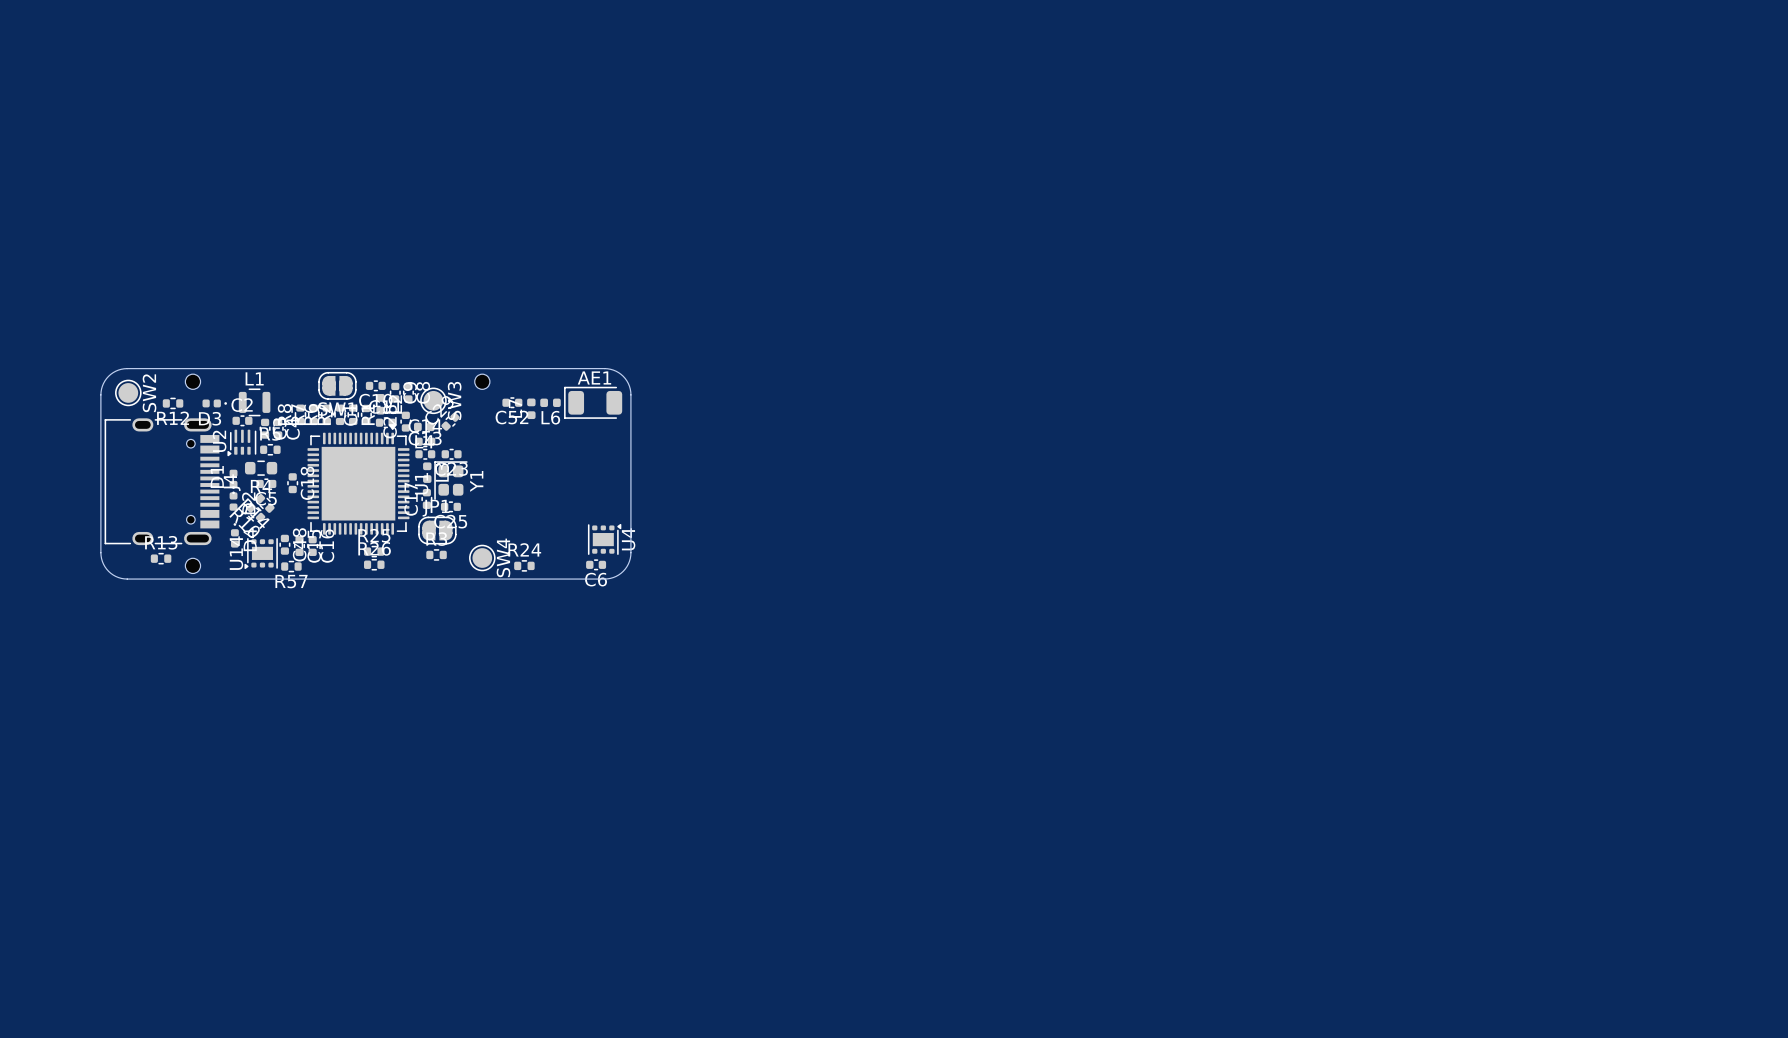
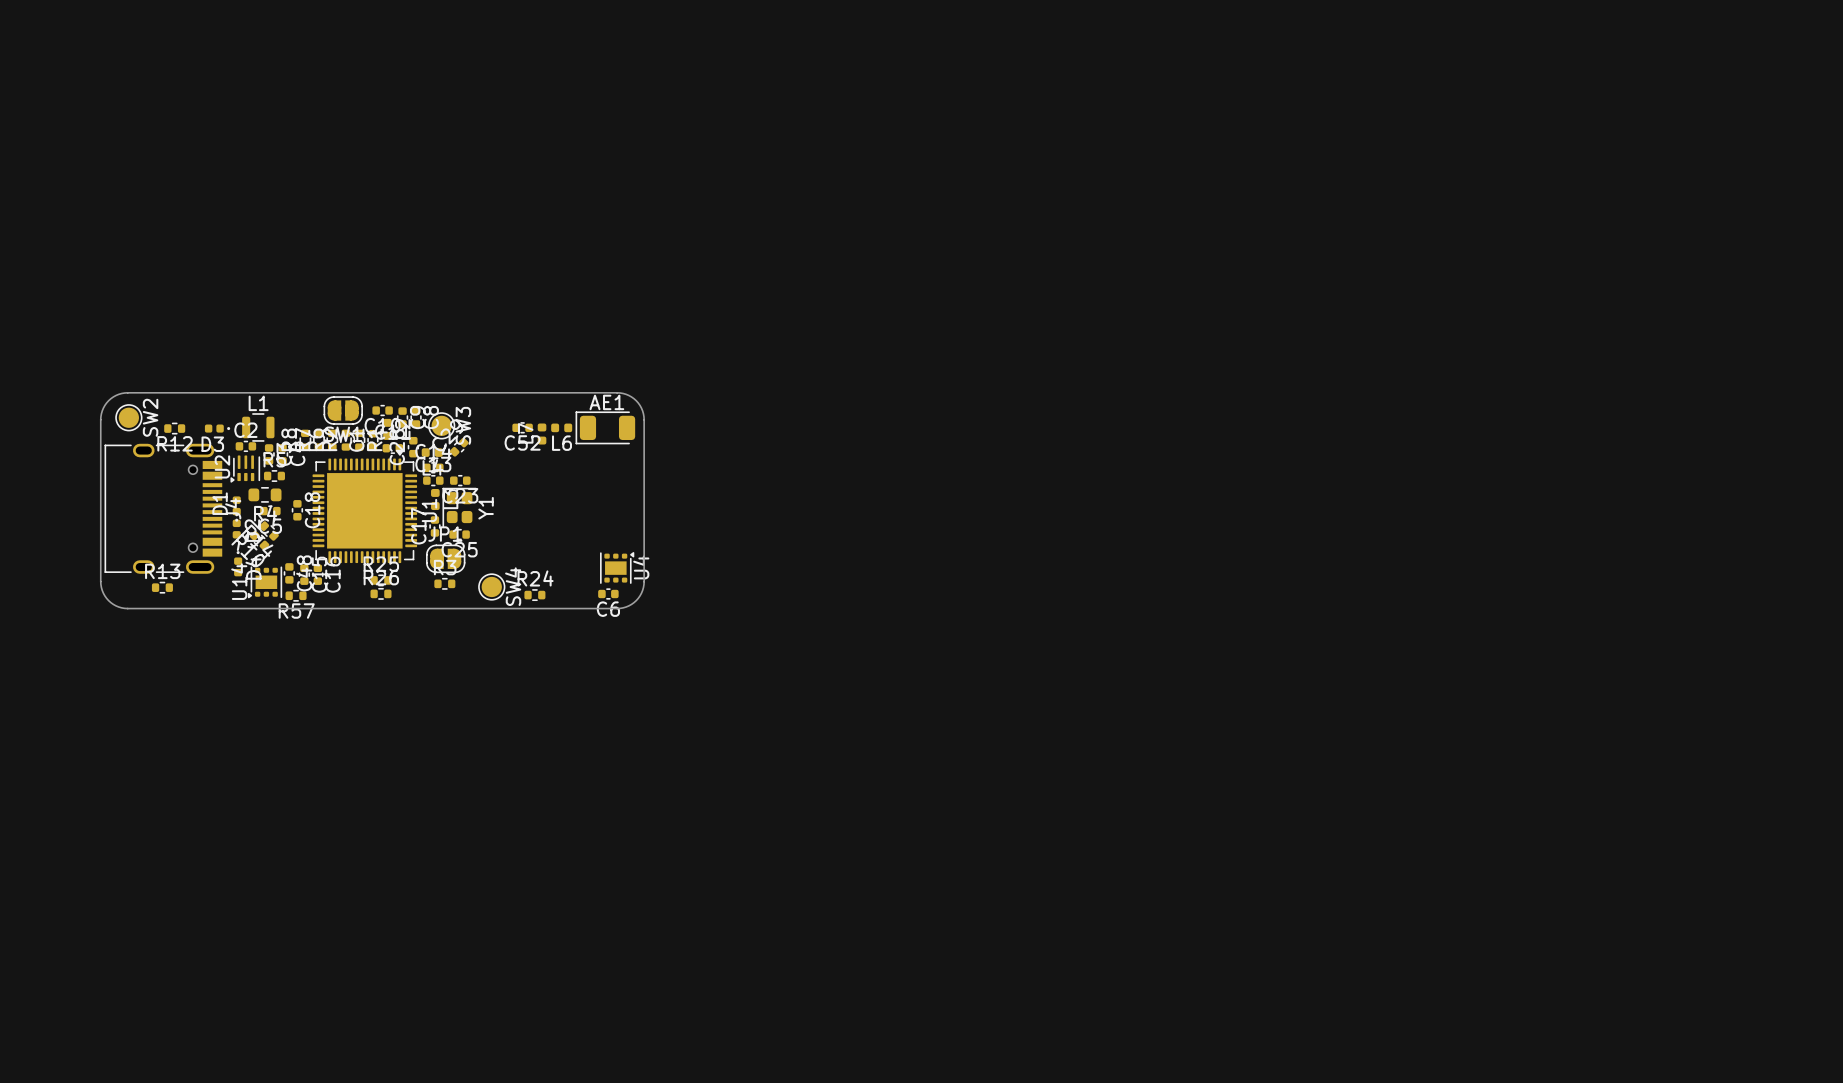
part: (192, 381) -> none
part: (482, 381) -> none
part: (192, 565) -> none

